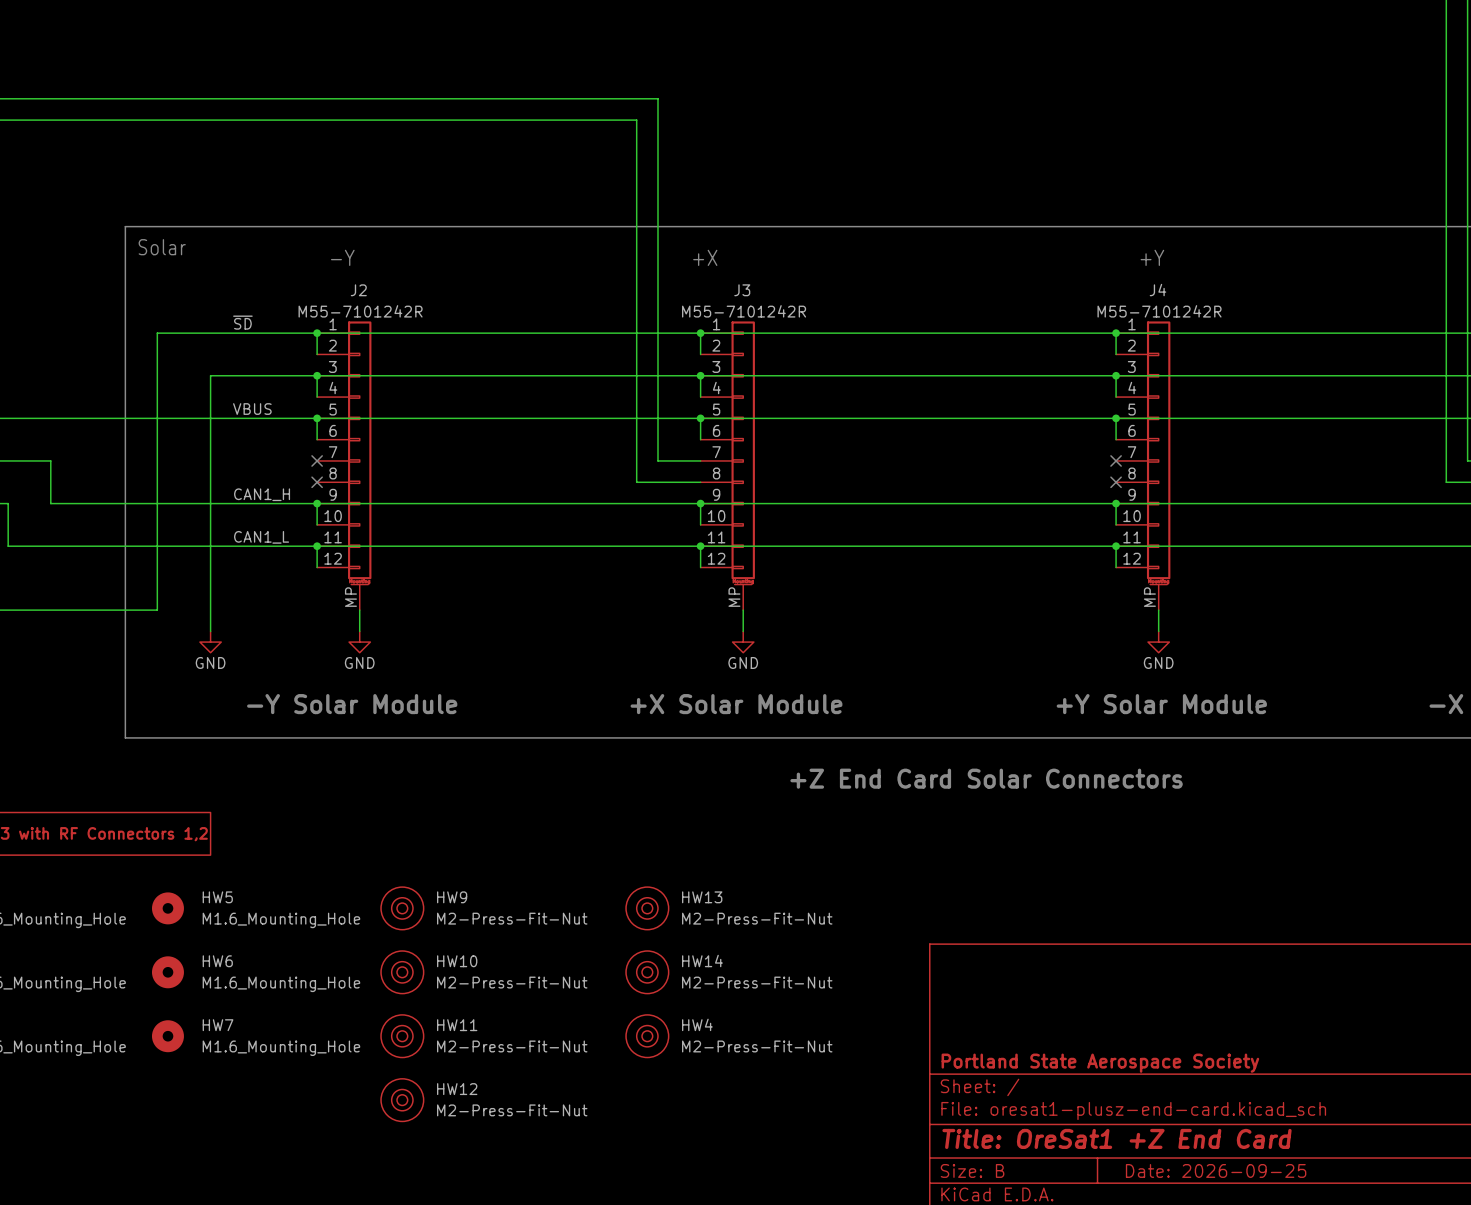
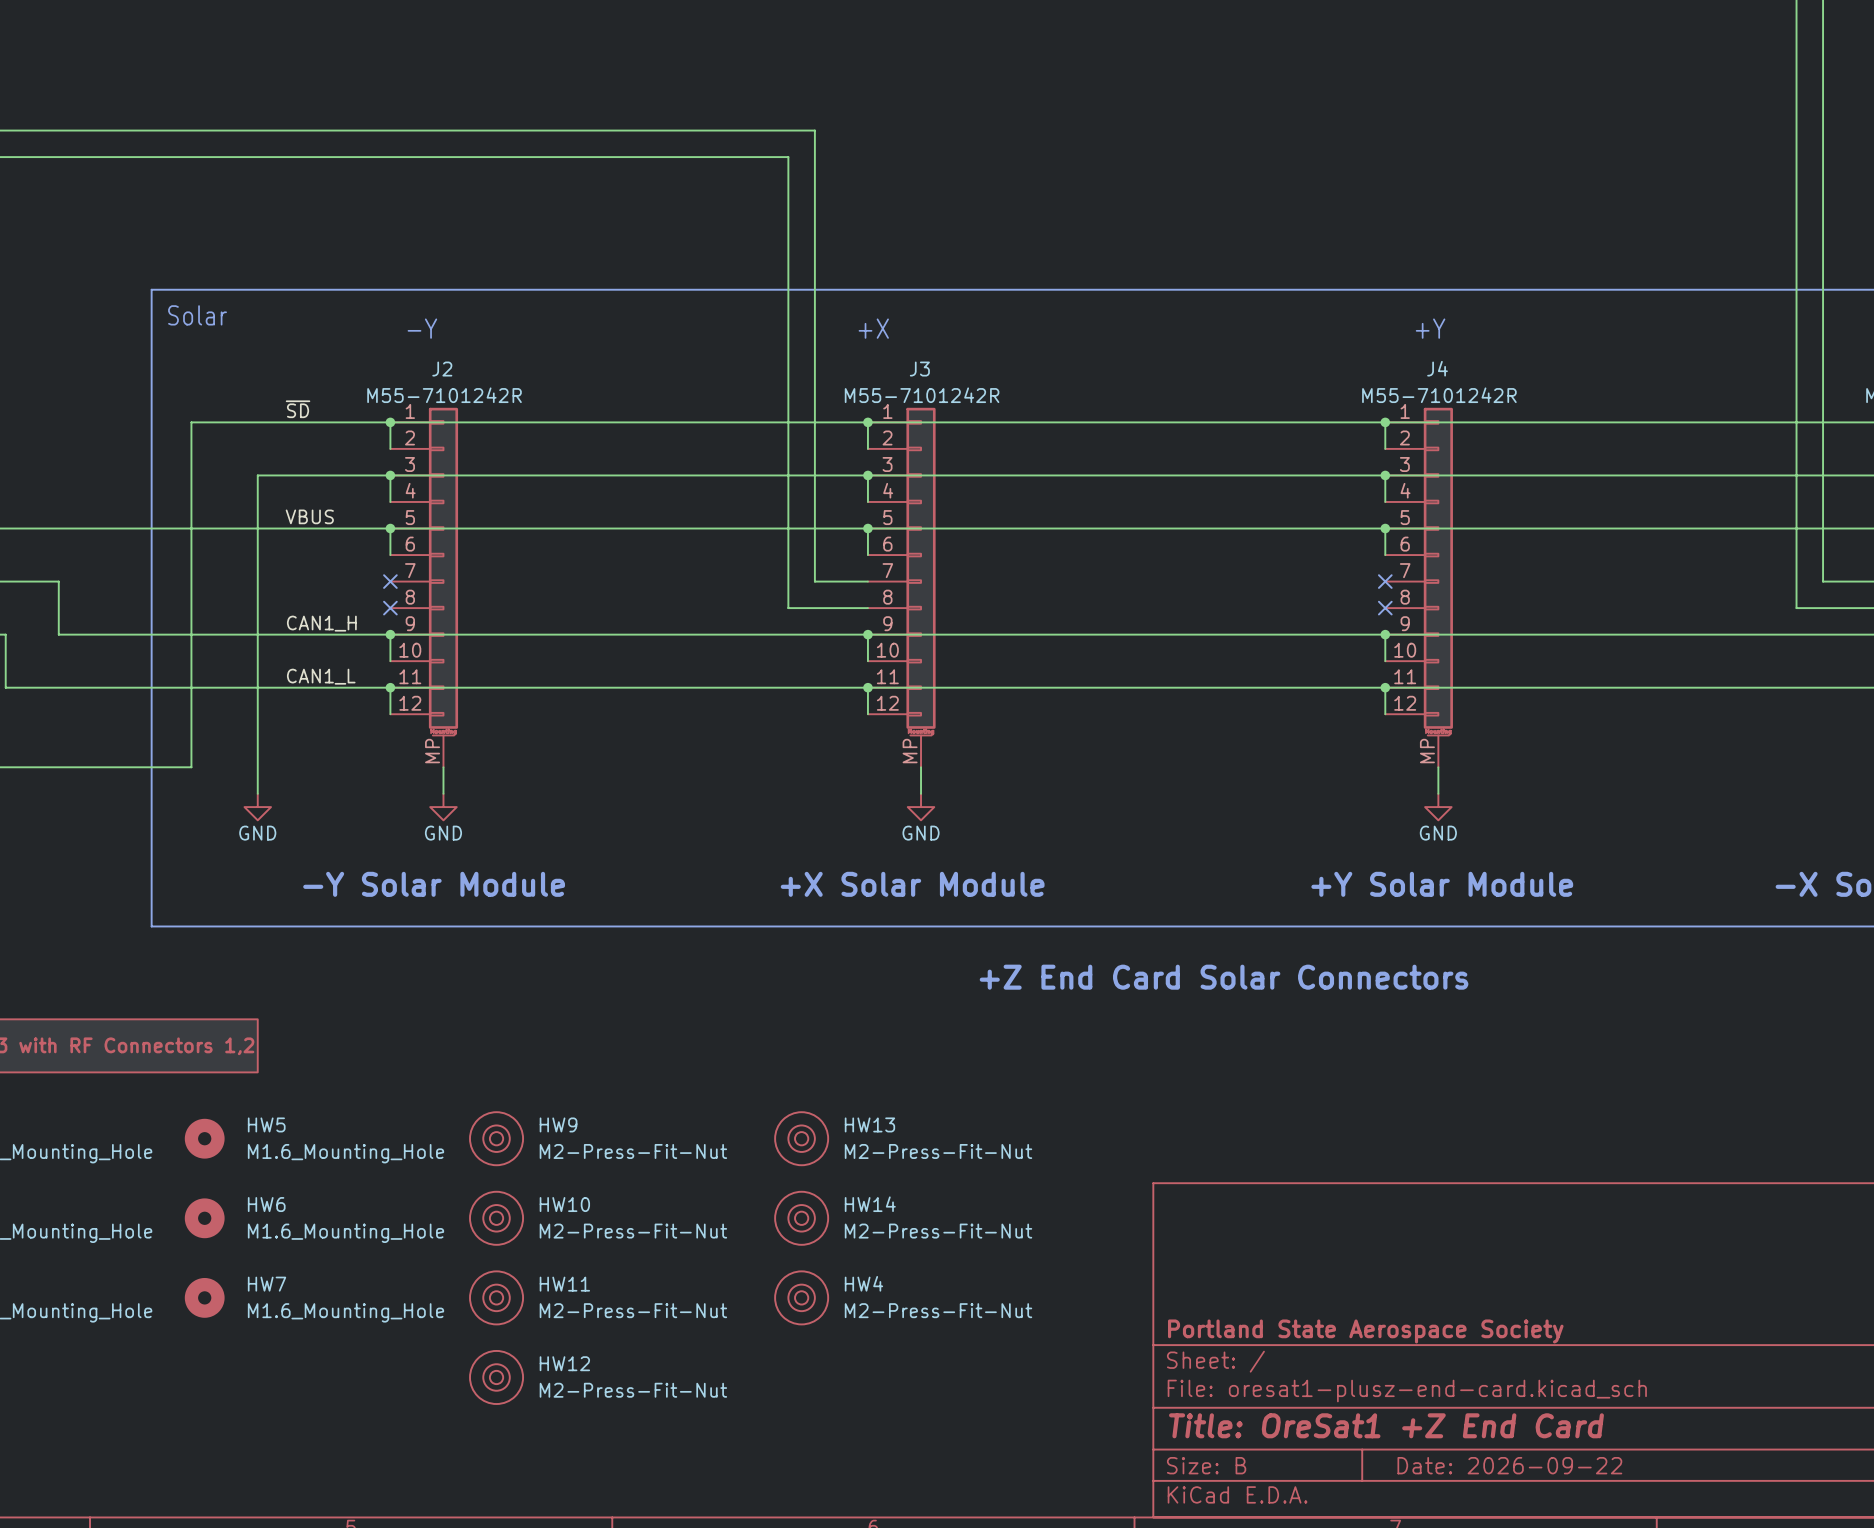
title block: Date: 2026-09-25 (1216, 1170) -> Date: 2026-09-22 (1509, 1465)

